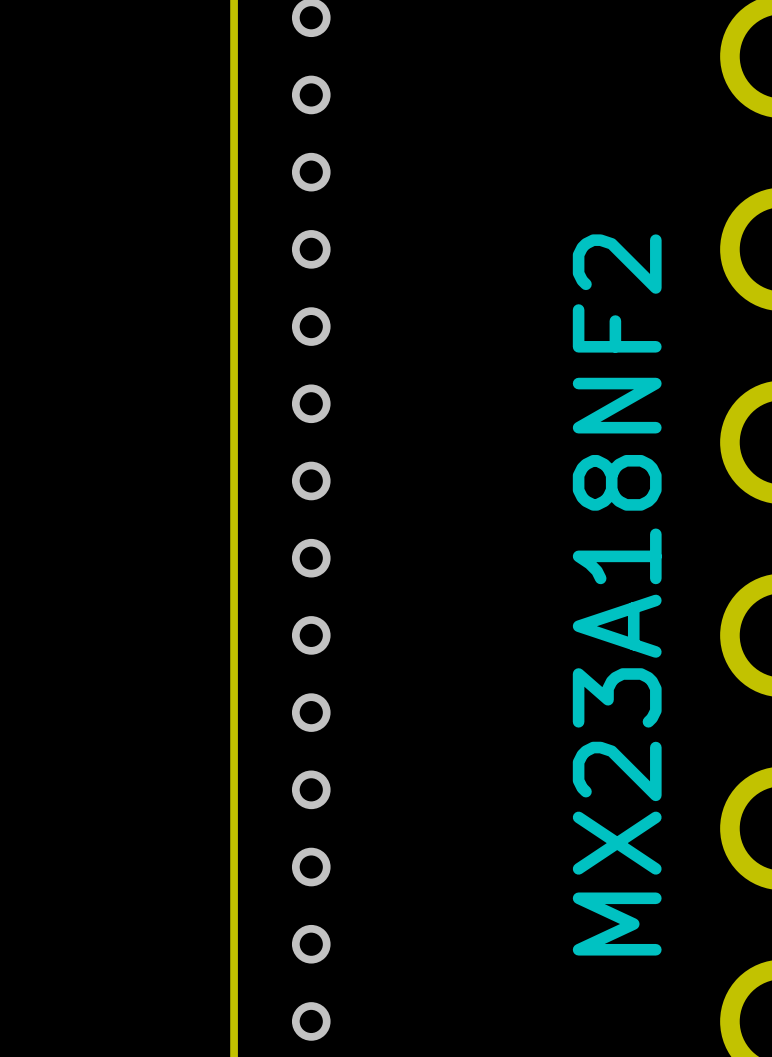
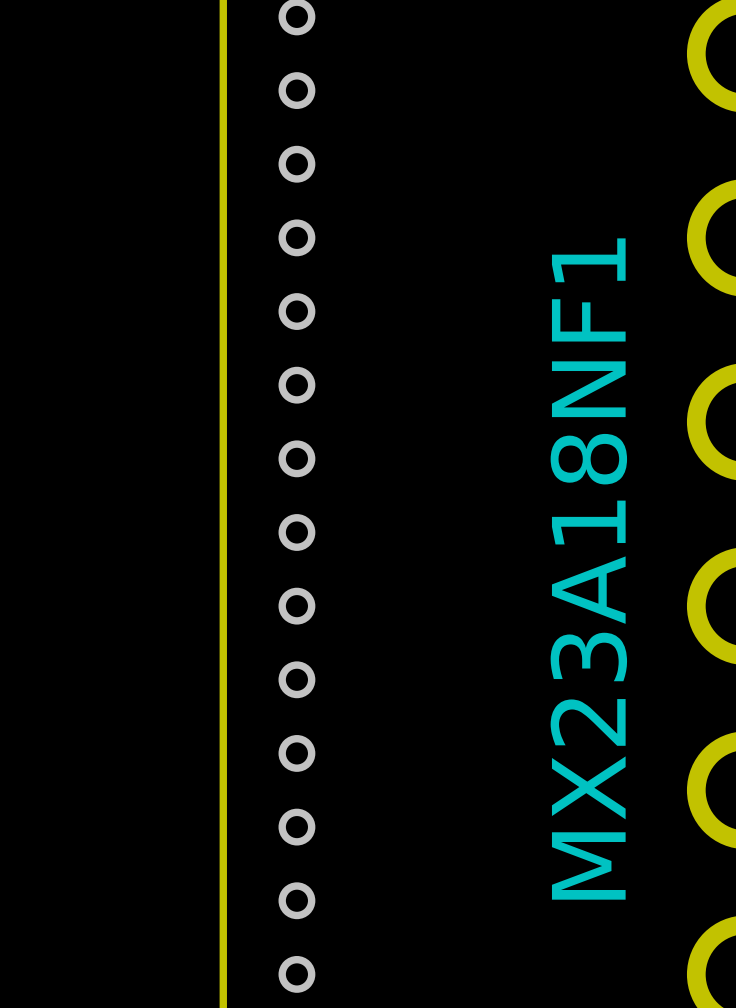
part value: MX23A18NF2 (617, 594) -> MX23A18NF1 (588, 569)

